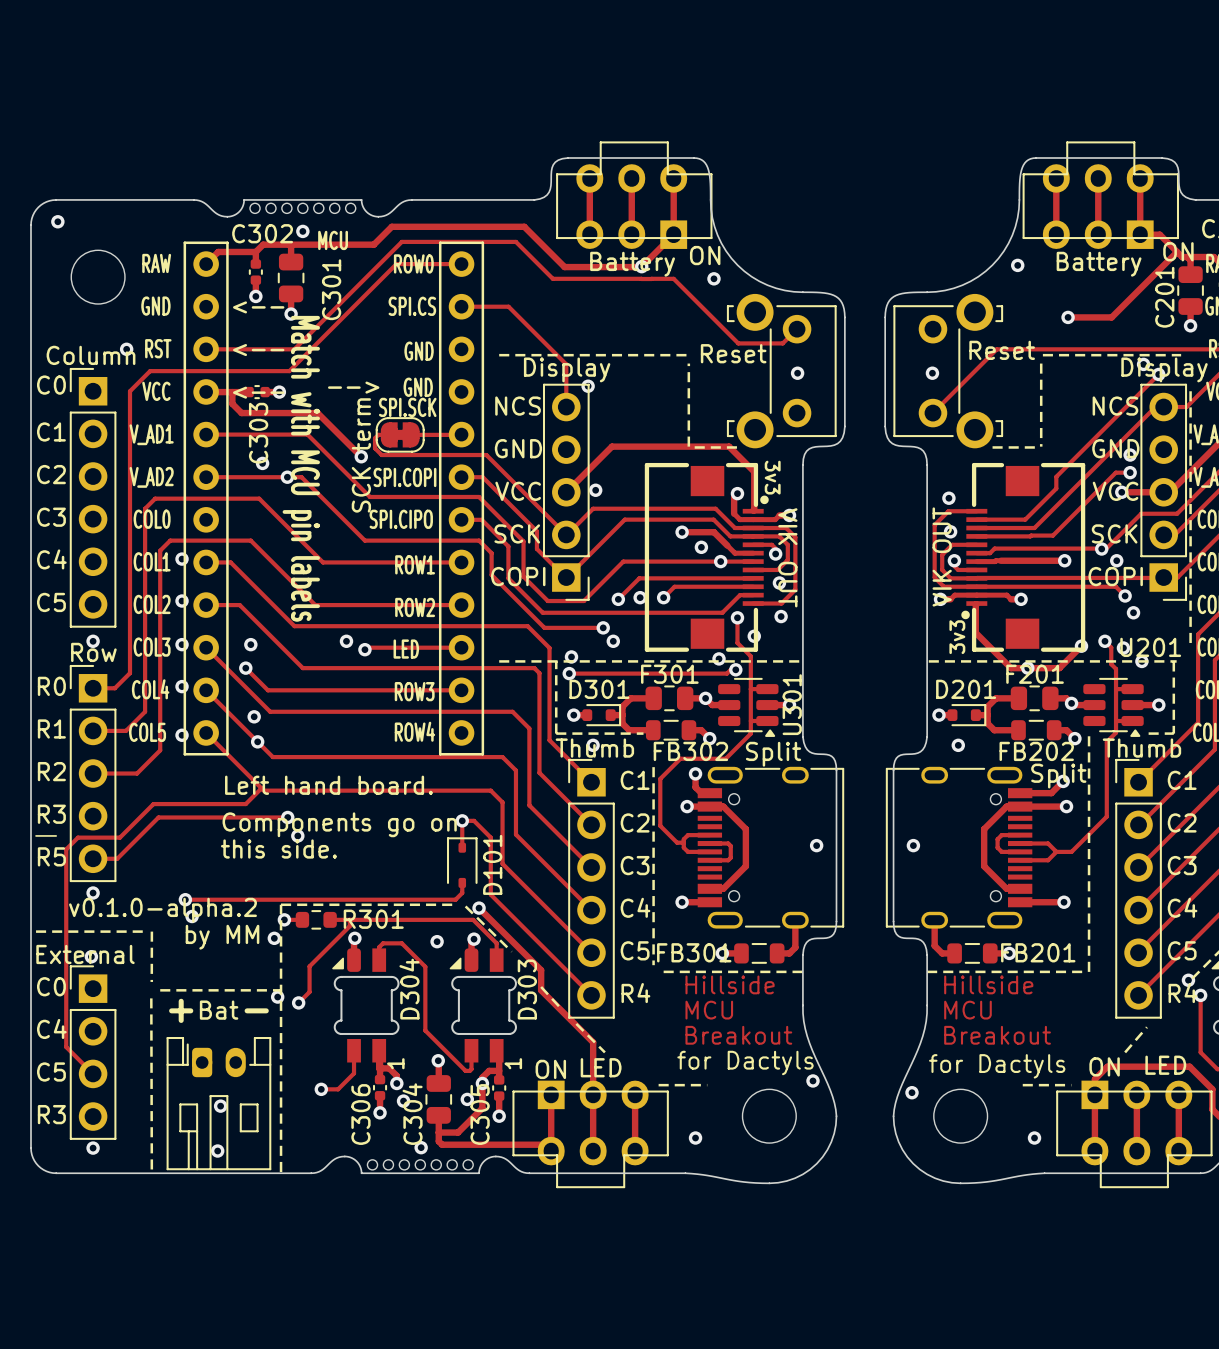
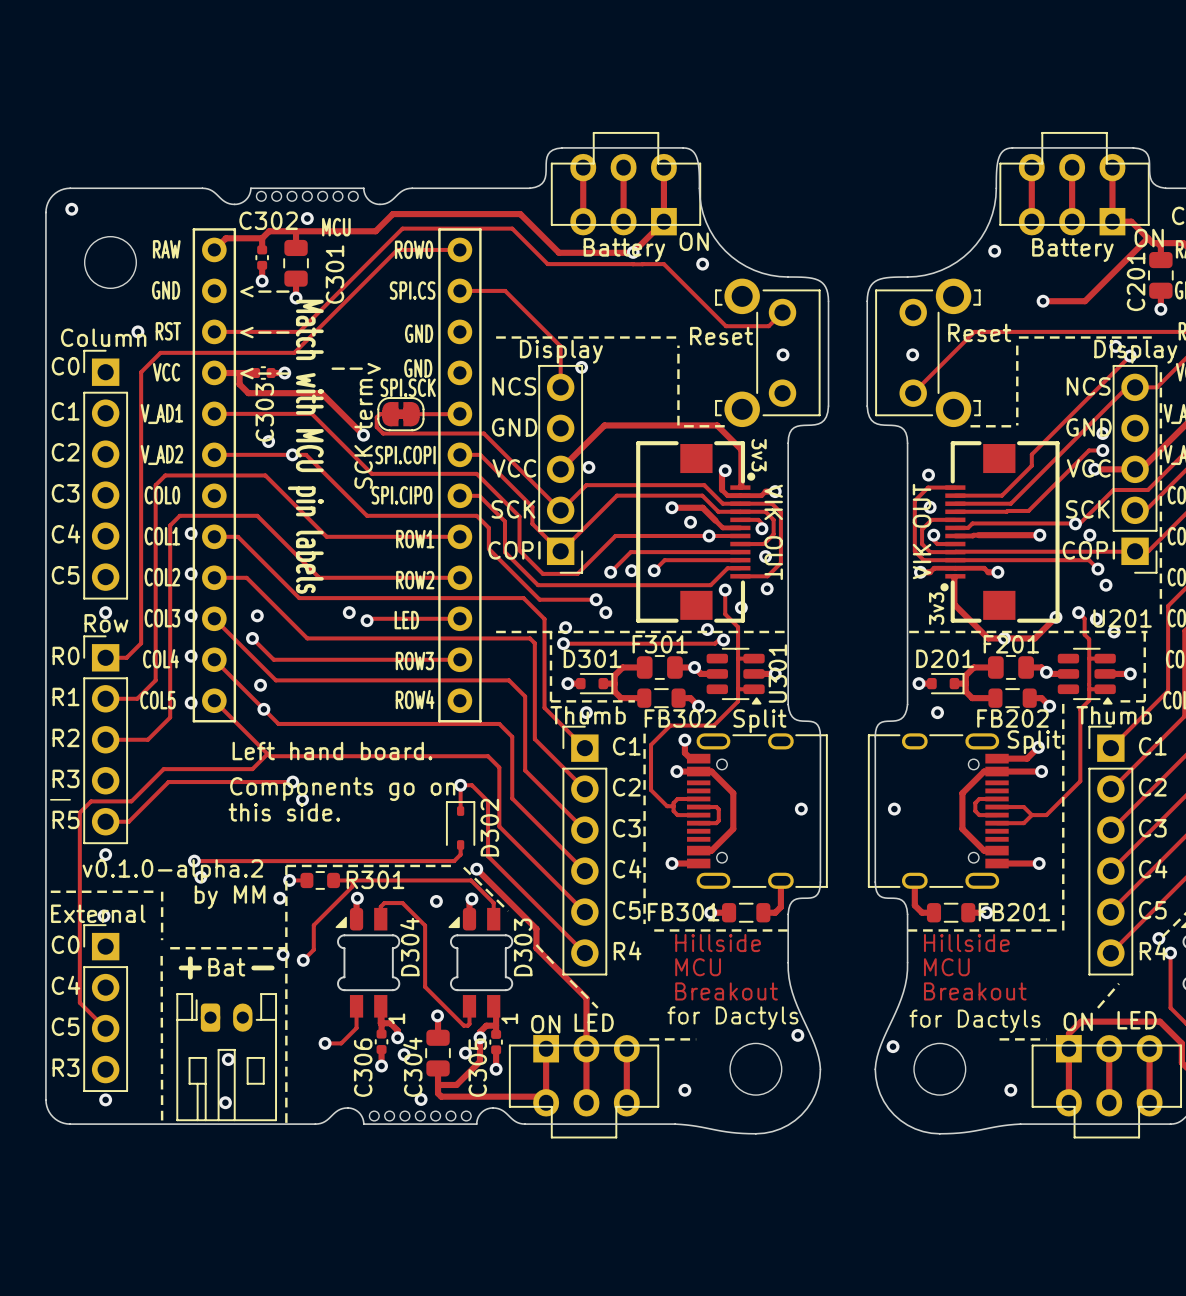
D101 name: D101 (492, 864) -> D302 (489, 827)

